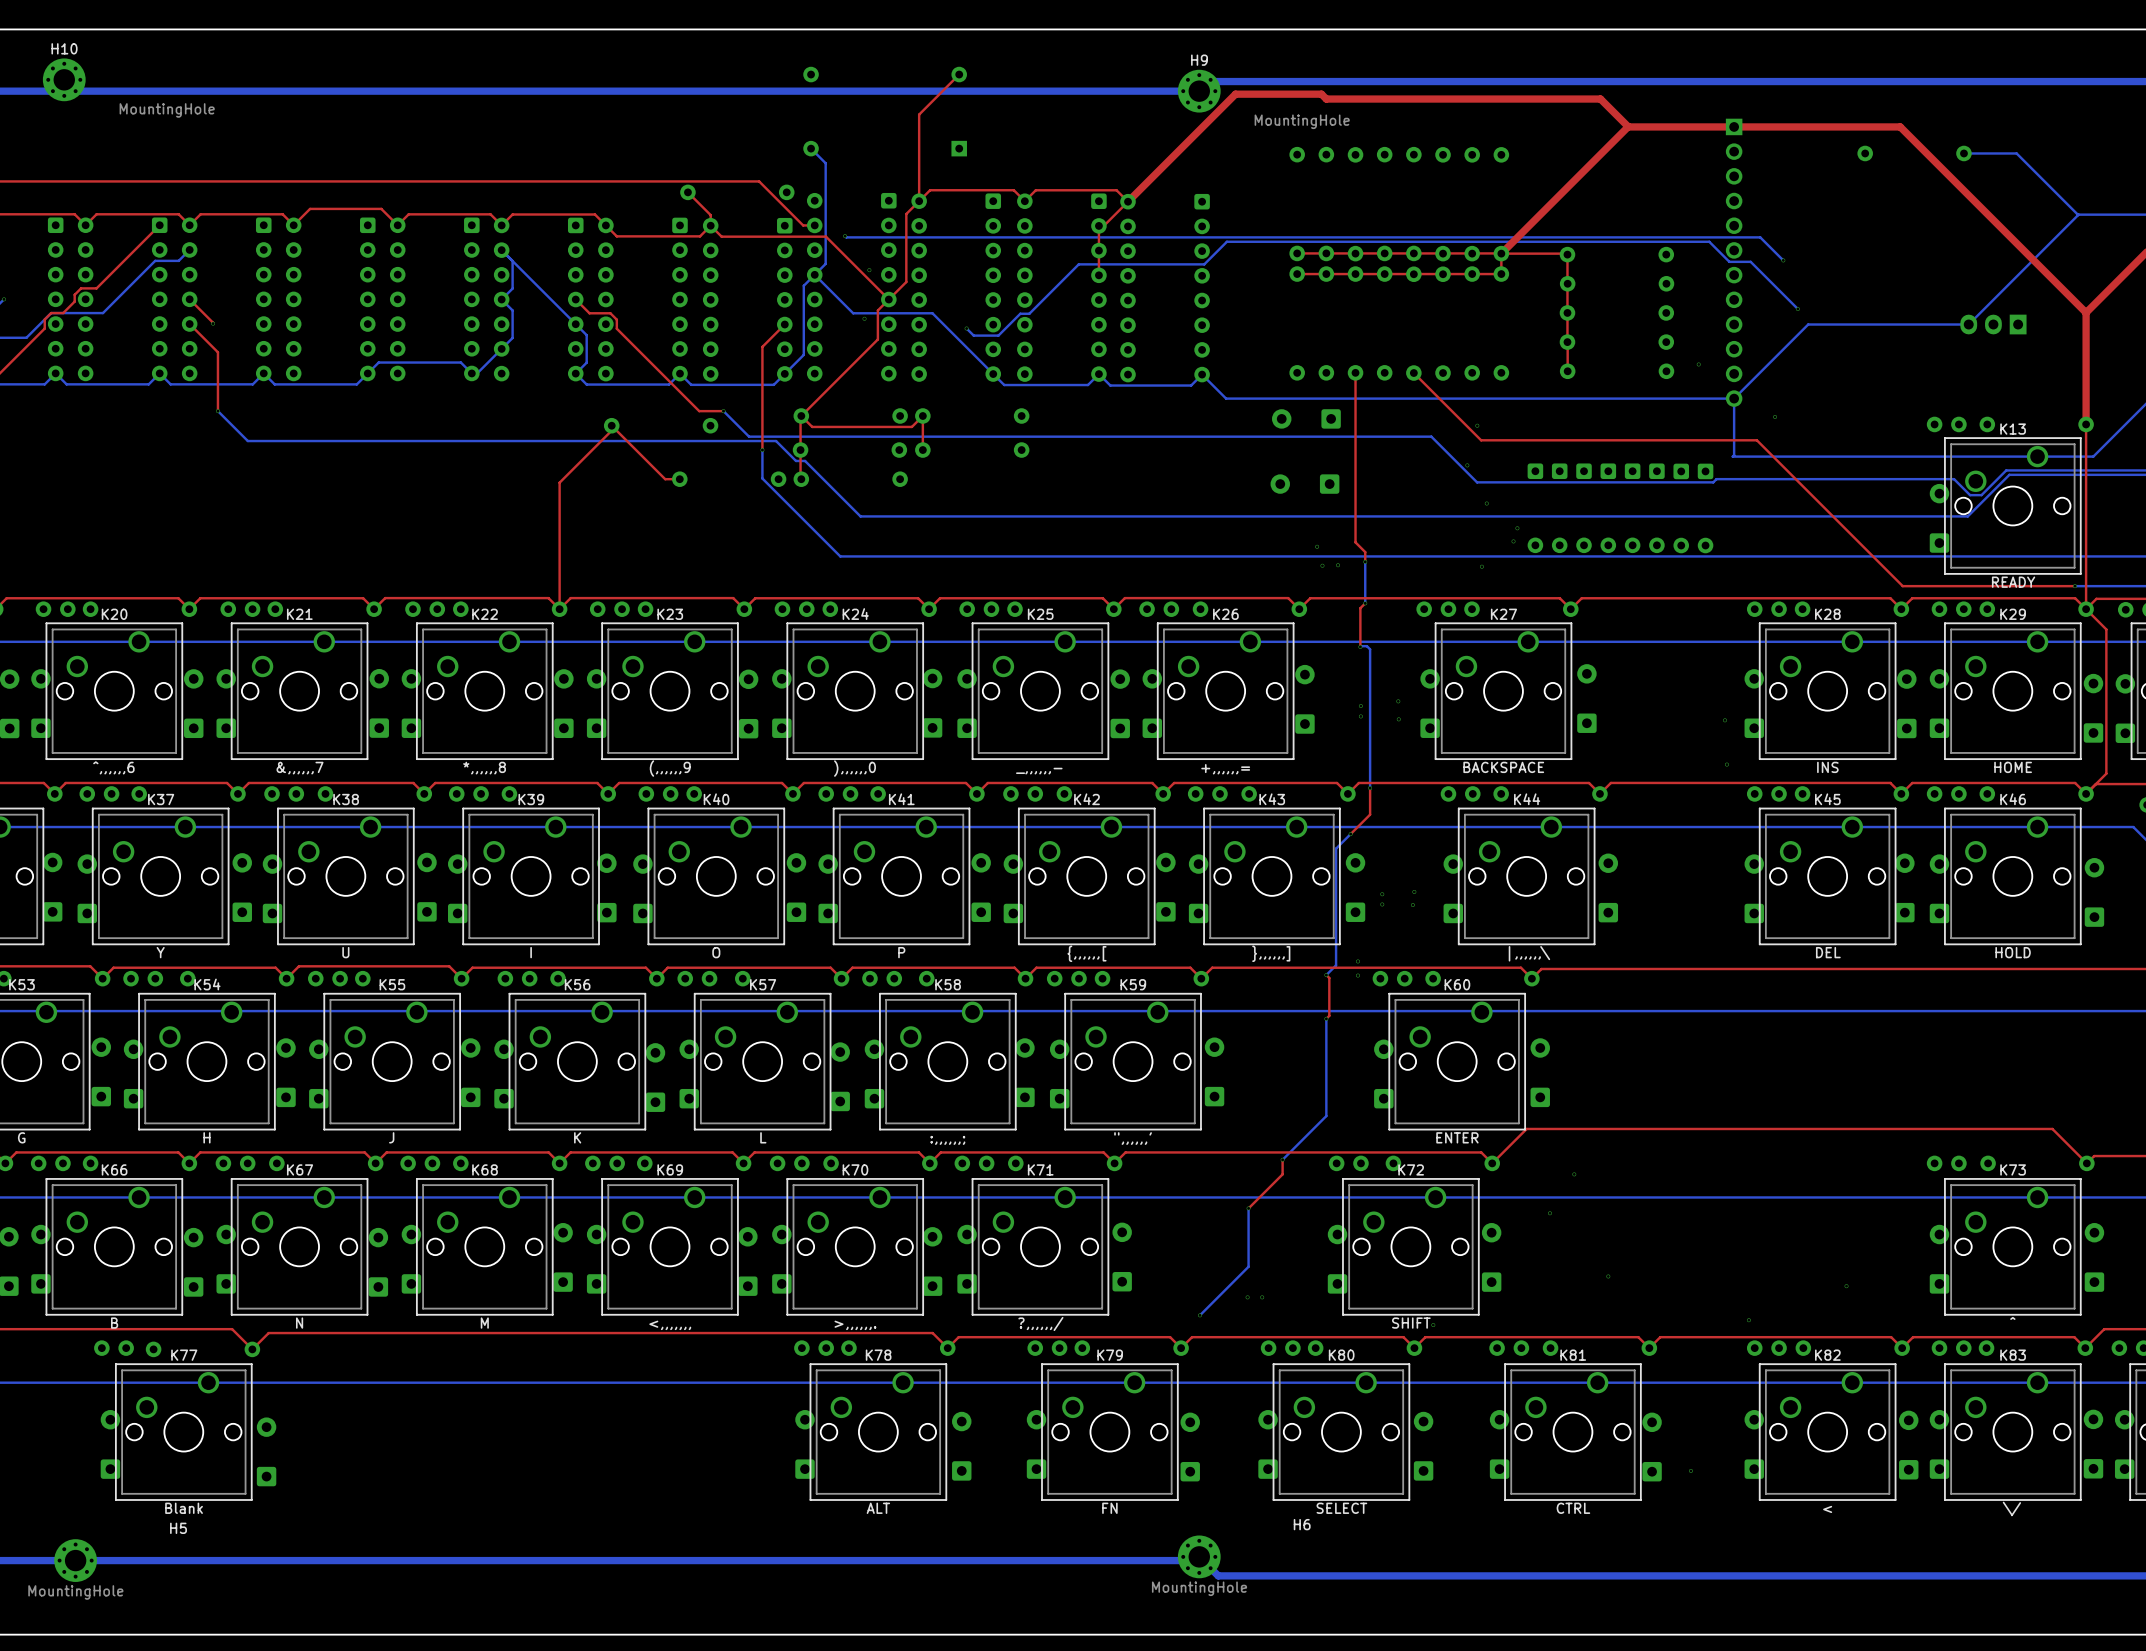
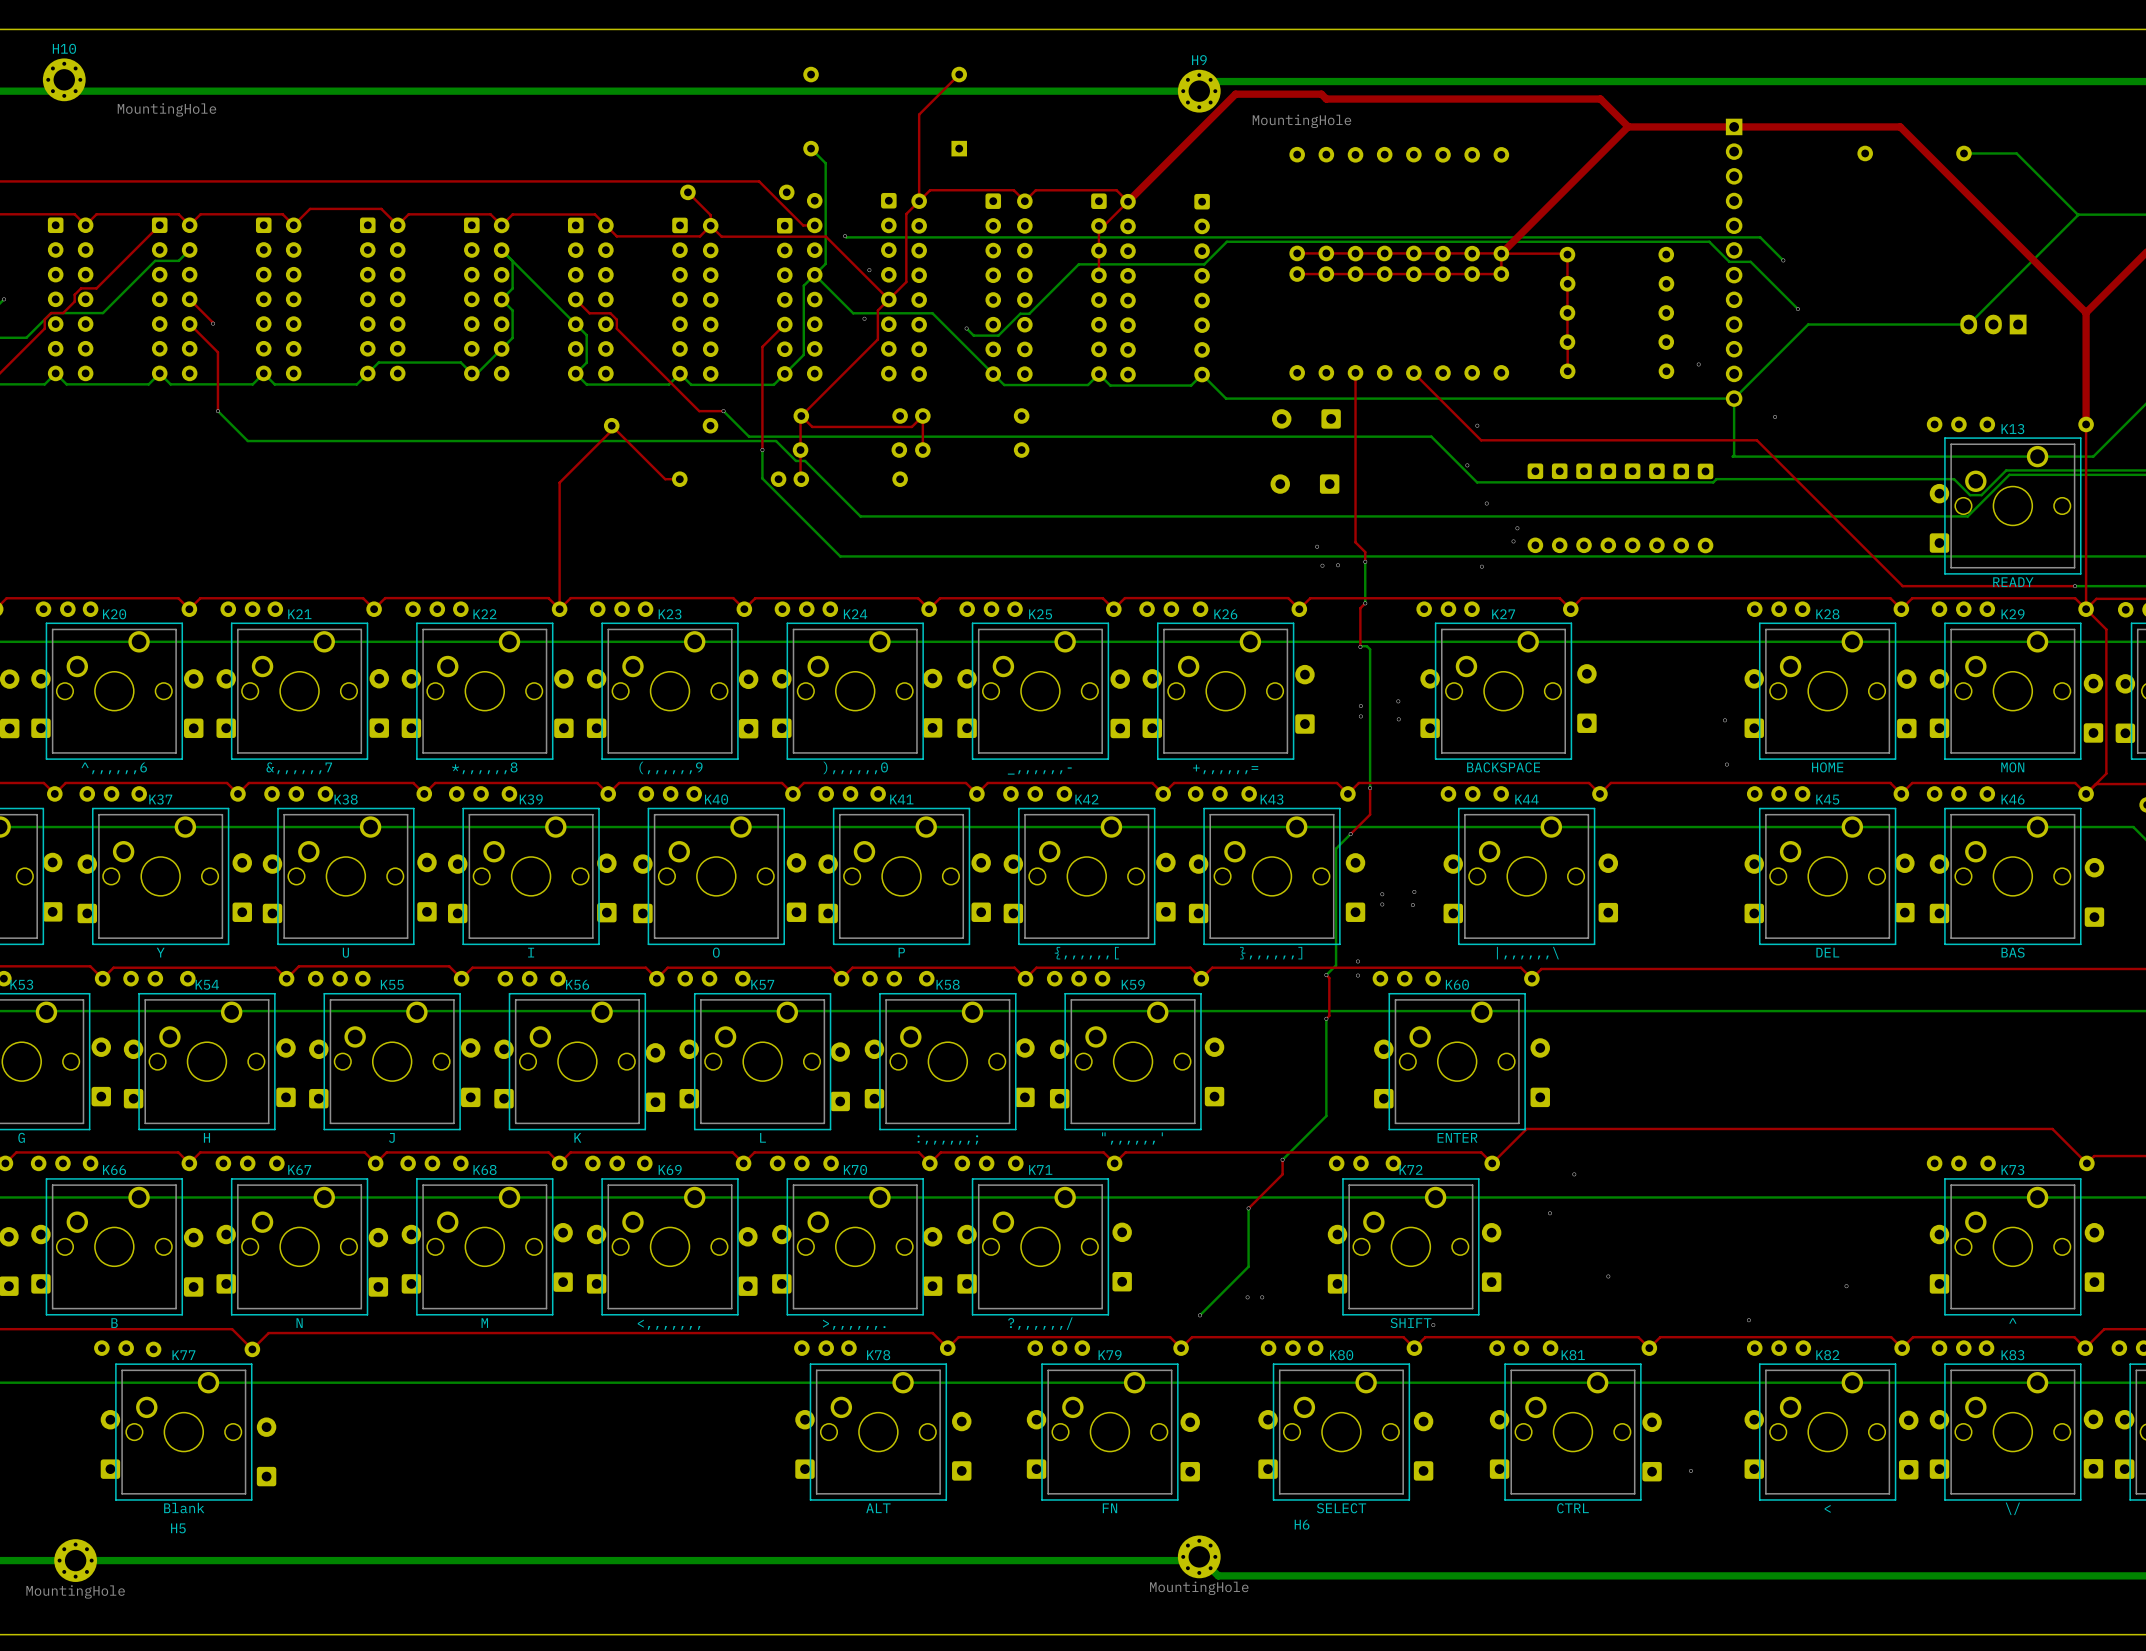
K28 value: INS (1827, 767) -> HOME (1827, 767)
K29 value: HOME (2013, 767) -> MON (2012, 767)
K46 value: HOLD (2013, 952) -> BAS (2013, 952)

